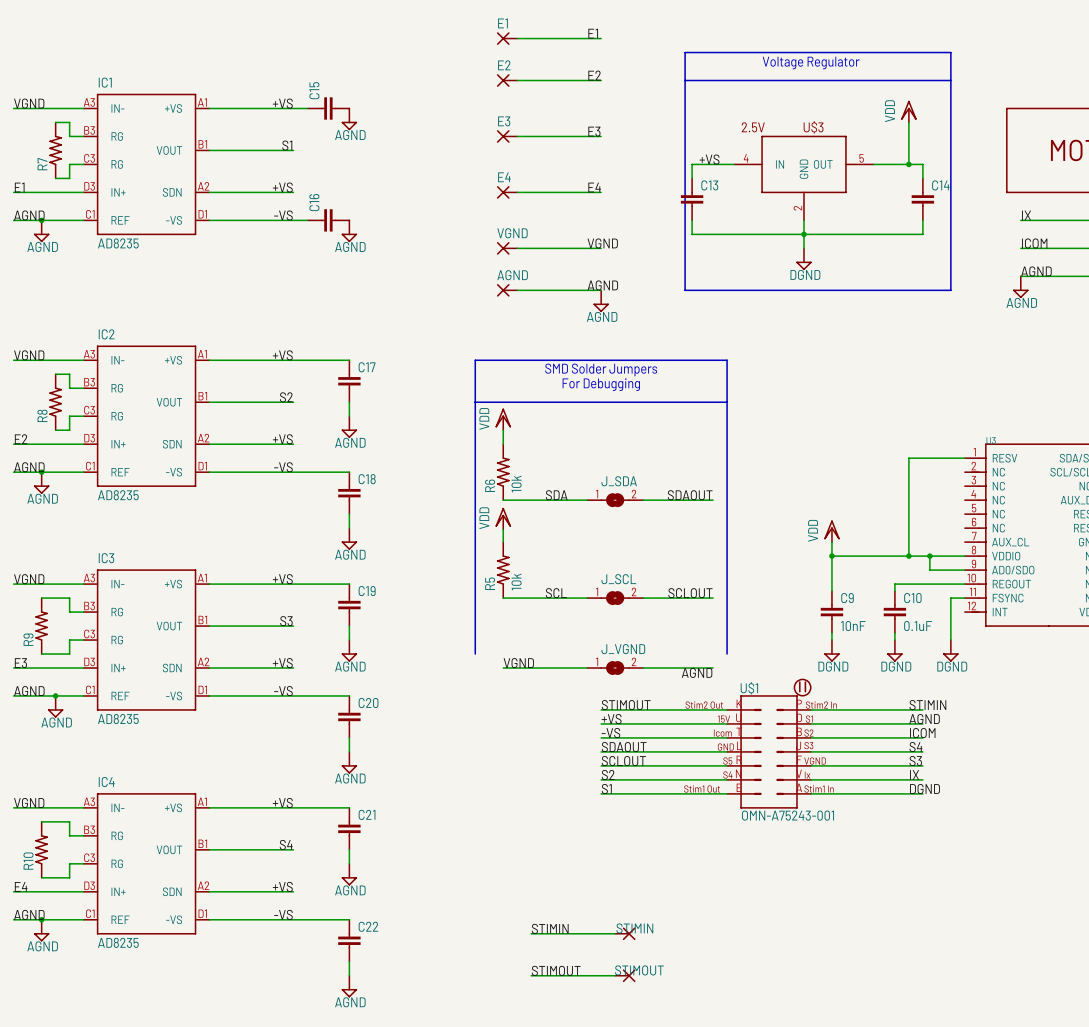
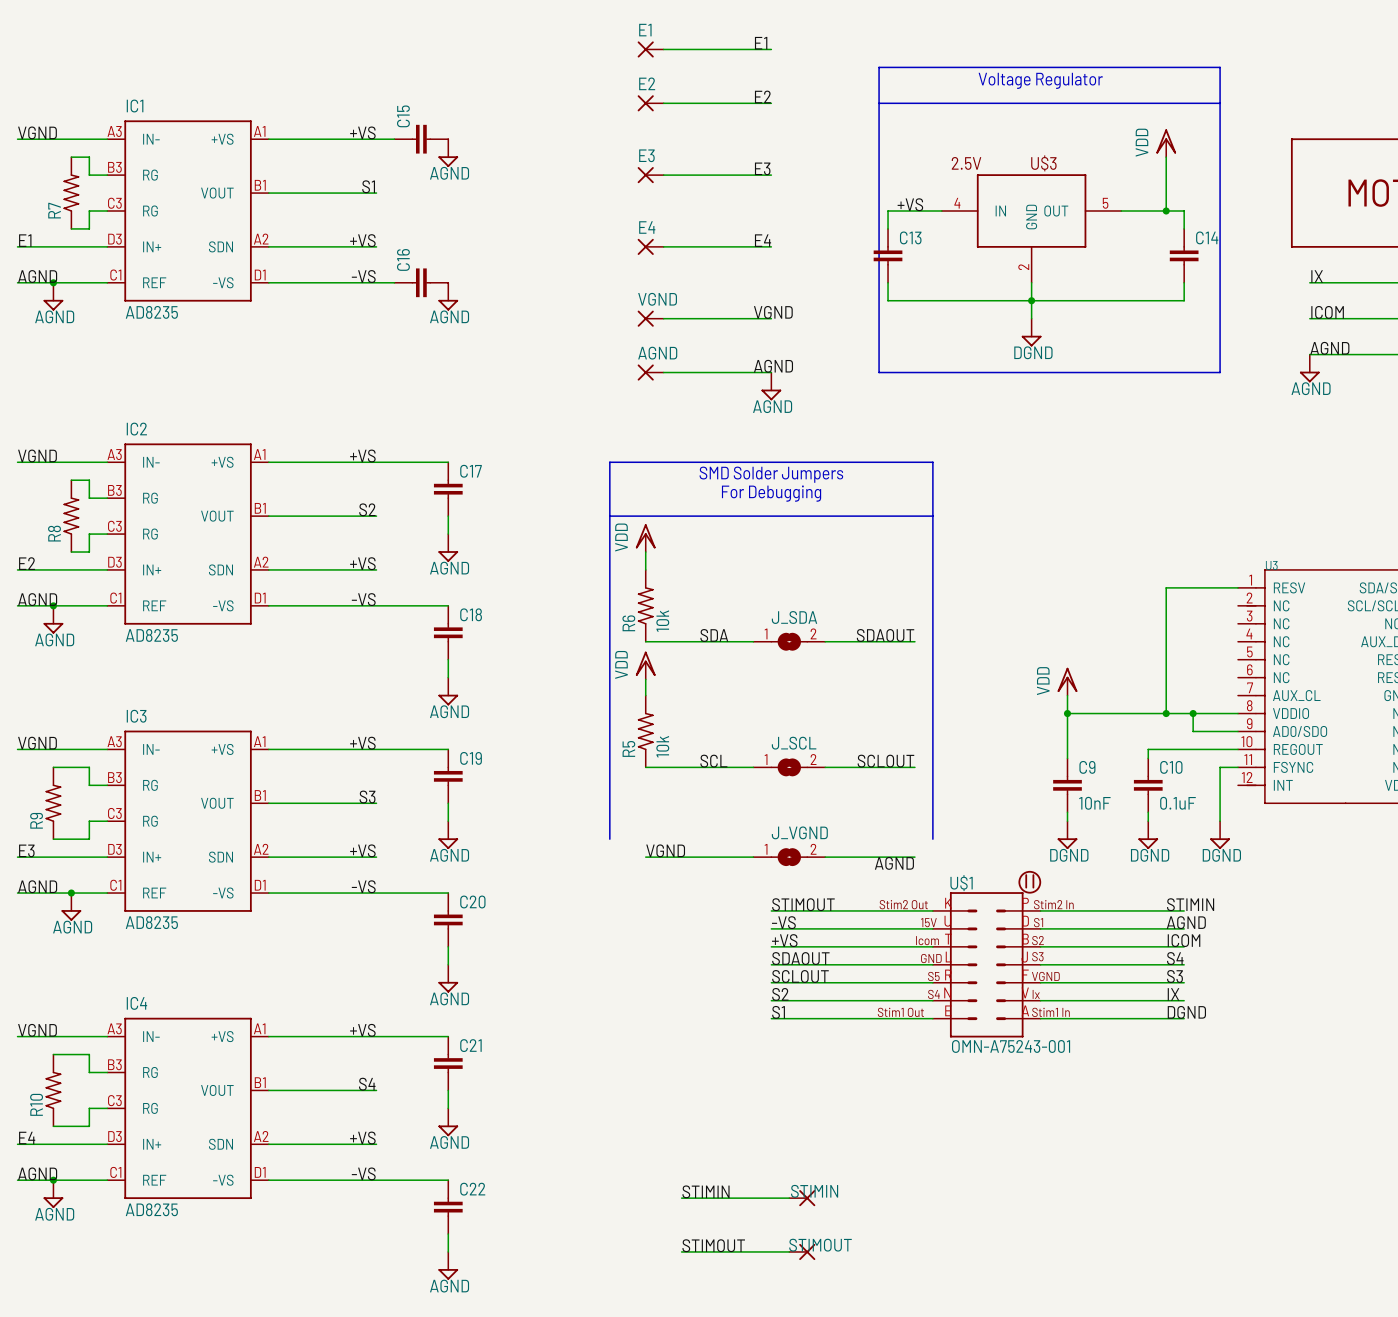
label: +VS (611, 719) -> -VS (783, 922)
label: -VS (610, 733) -> +VS (784, 940)

